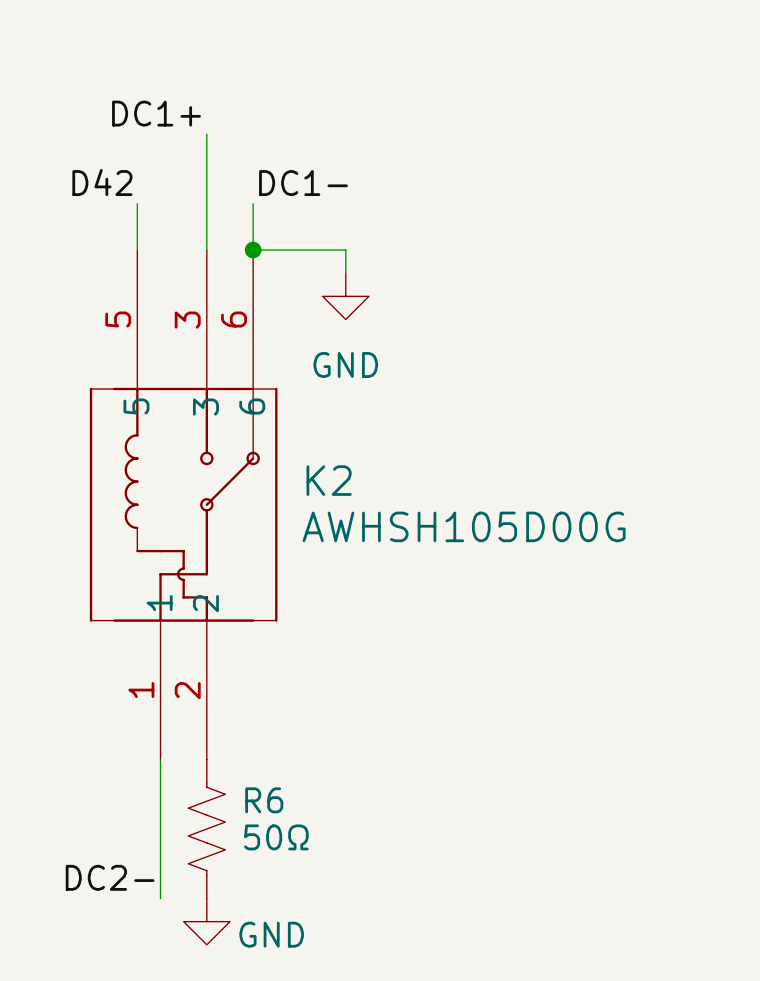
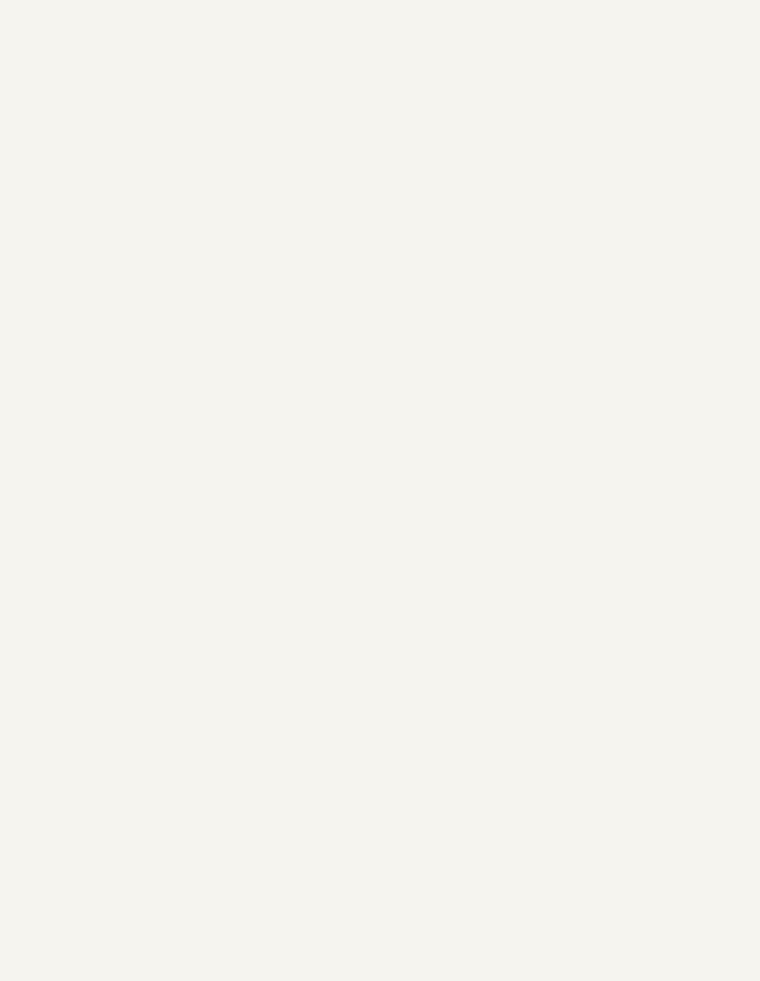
label: DC1+ (156, 113) -> none
wire: (206, 134) (206, 250) -> none
label: D42 (102, 182) -> none
label: DC1- (303, 183) -> none
wire: (137, 203) (137, 250) -> none
wire: (253, 203) (253, 250) (345, 250) (345, 273) -> none
junction: (253, 250) -> none
power symbol: GND (345, 296) -> none
K2: AWHSH105D00G (183, 504) -> none
wire: (160, 759) (160, 898) -> none
R6: 50Ω (206, 829) -> none
label: DC2- (110, 877) -> none
power symbol: GND (206, 921) -> none

